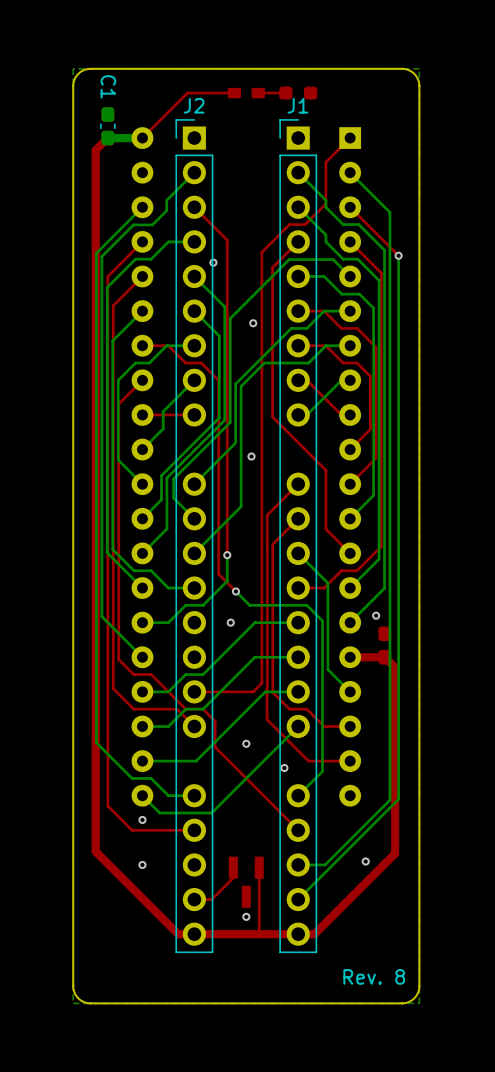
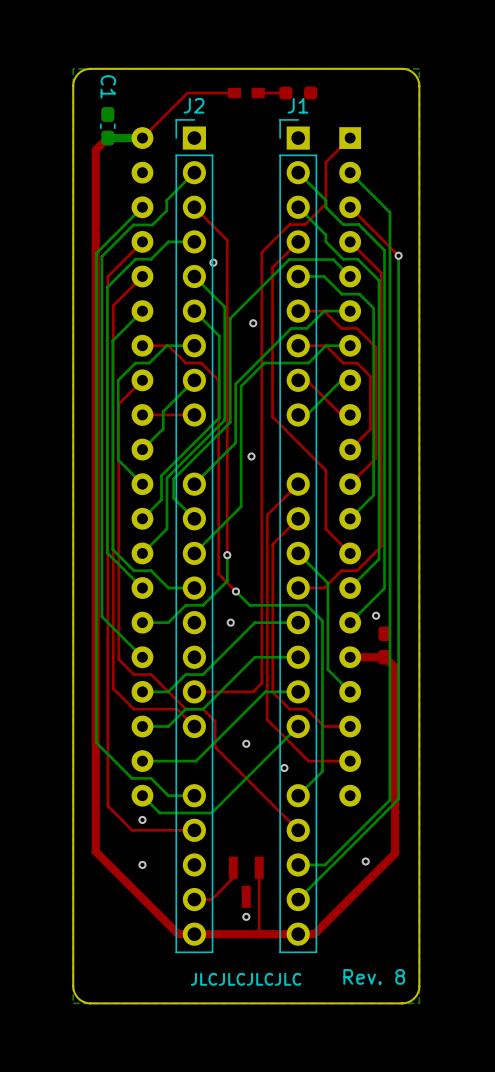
text: none -> JLCJLCJLCJLC (246, 979)

